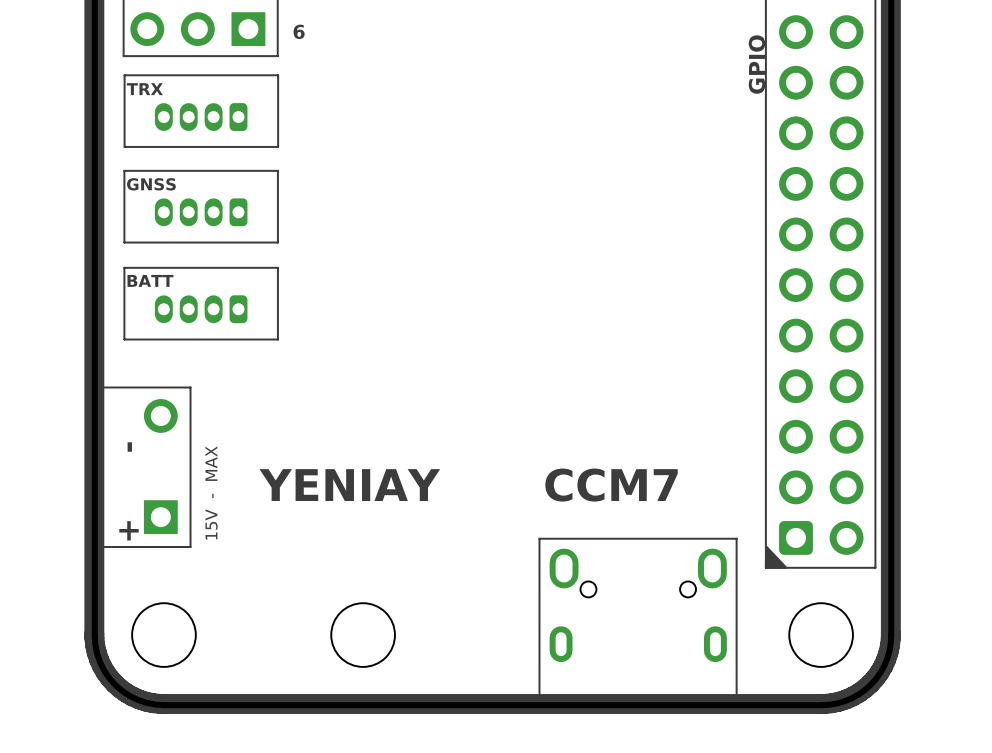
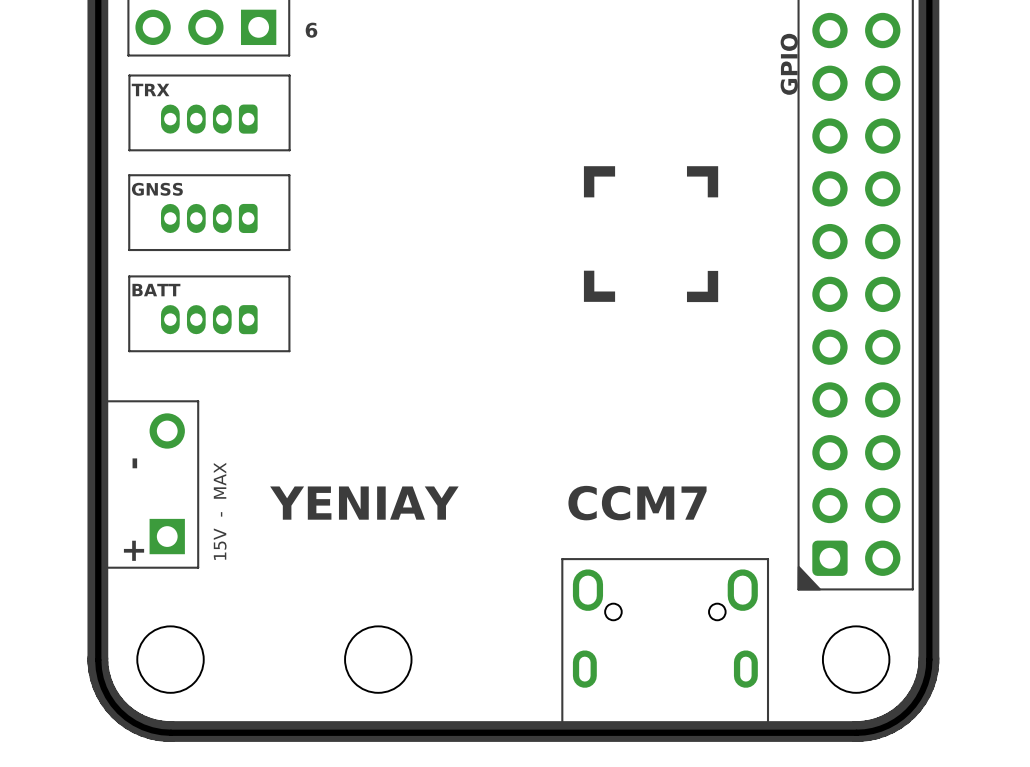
drawing: none -> [583, 166, 616, 198]
drawing: none -> [686, 166, 719, 198]
drawing: none -> [583, 270, 616, 302]
drawing: none -> [686, 270, 719, 303]

